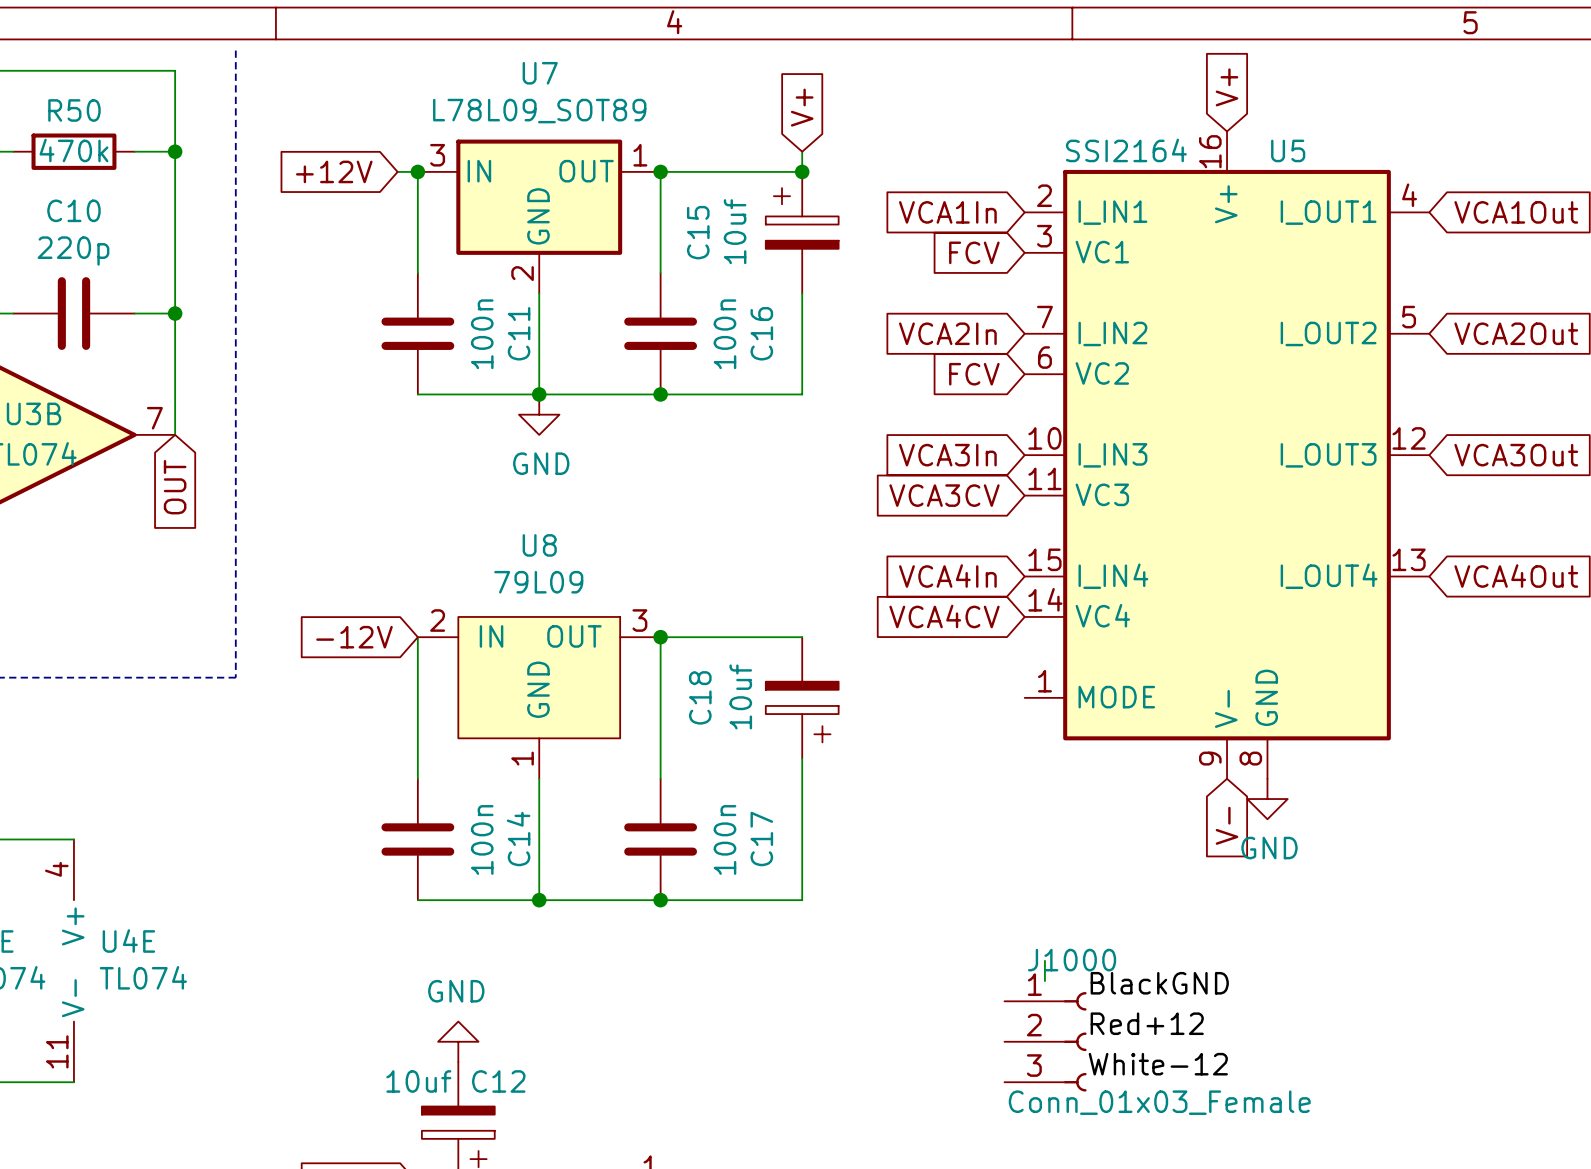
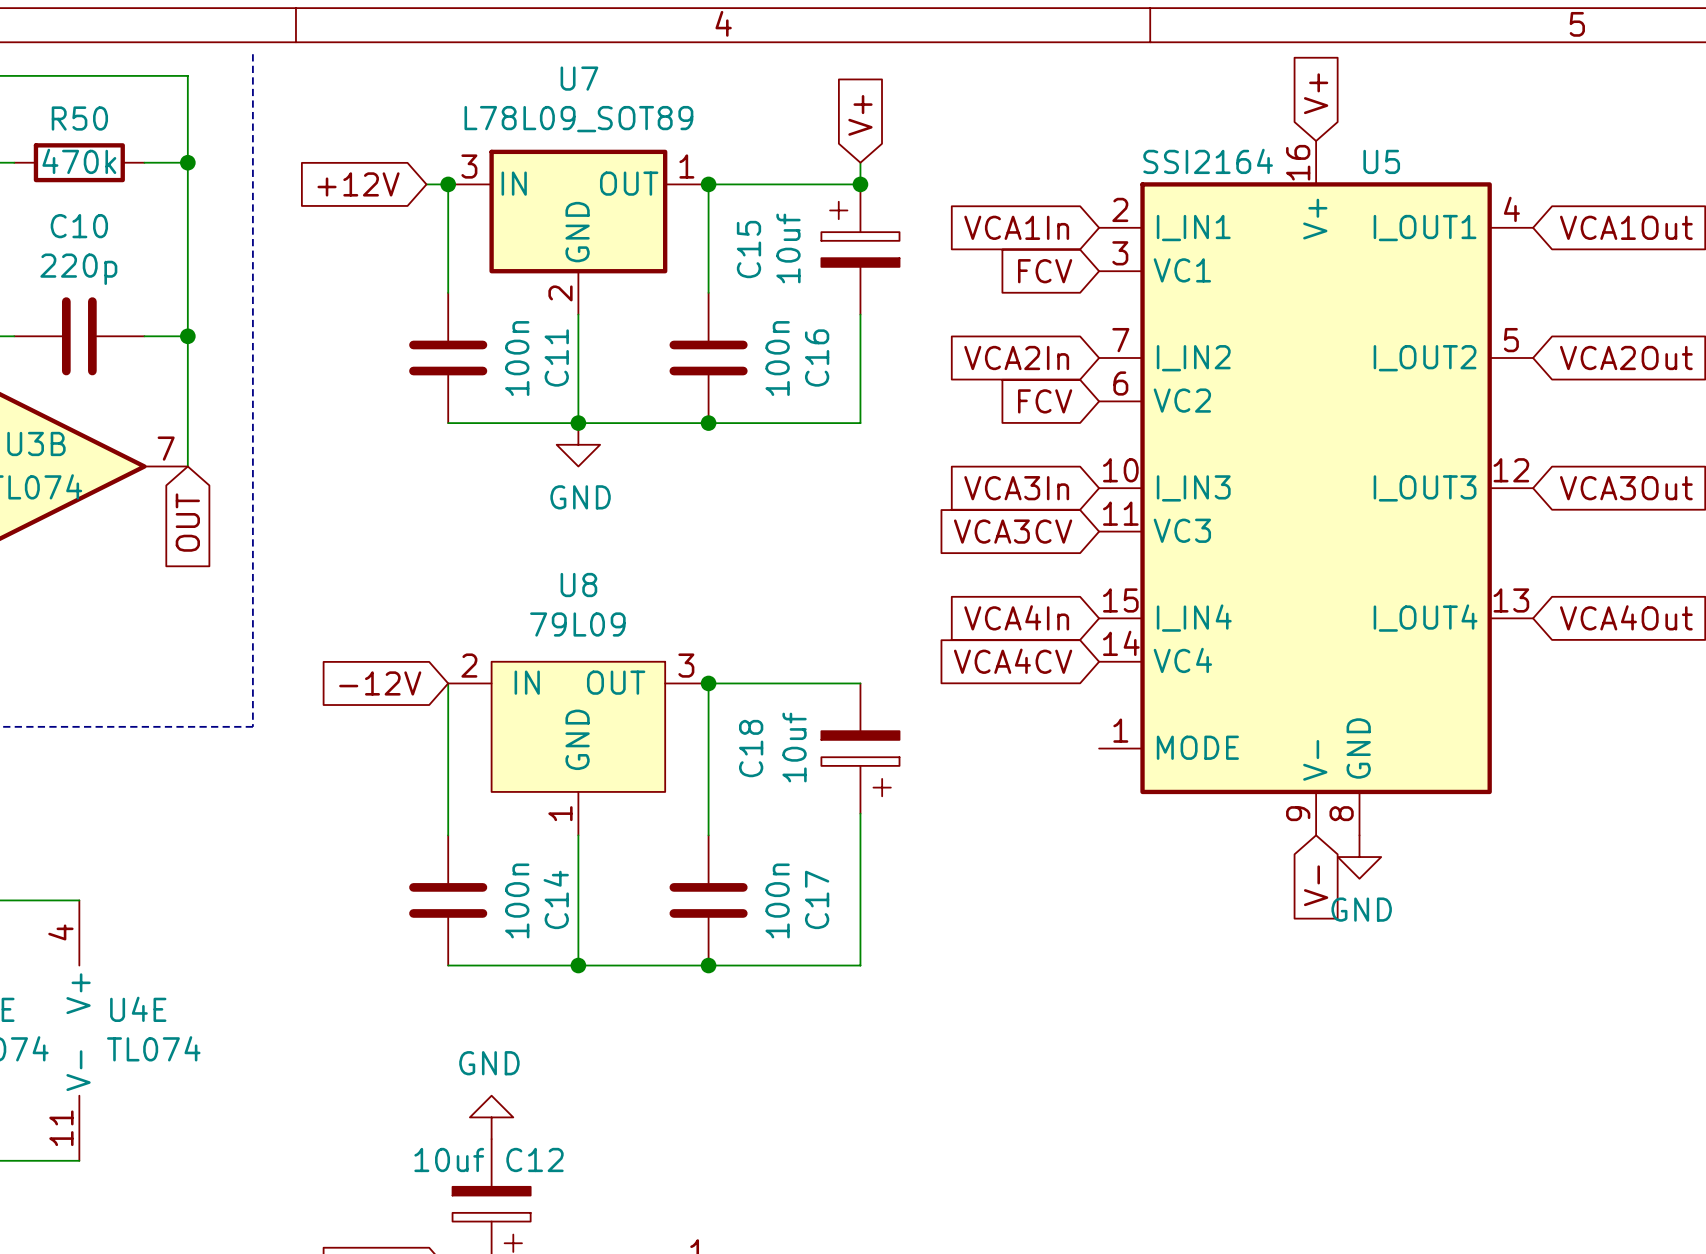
wire: (1044, 960) (1044, 981) -> none
label: BlackGND (1159, 983) -> none
label: Red+12 (1147, 1023) -> none
J1000: Conn_01x03_Female (1045, 1041) -> none
label: White-12 (1158, 1064) -> none

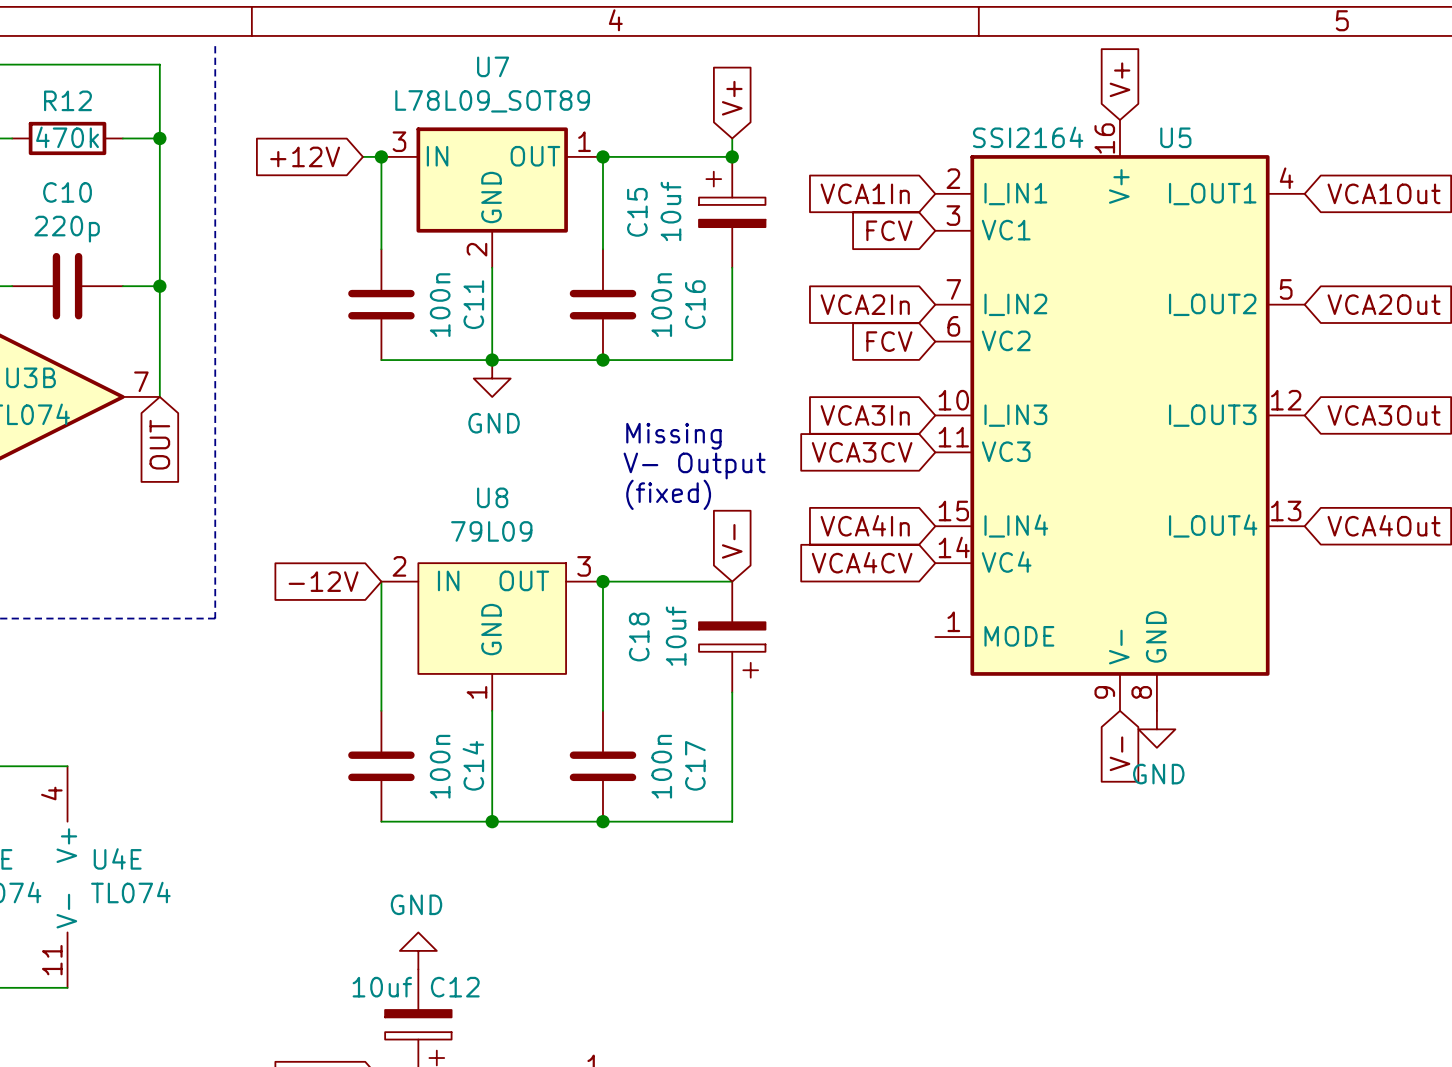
R50 name: R50 (79, 118) -> R12 (67, 100)
text: none -> Missing (673, 436)
text: none -> V- Output (694, 465)
text: none -> (fixed) (668, 494)
global label: none -> V- (732, 541)

